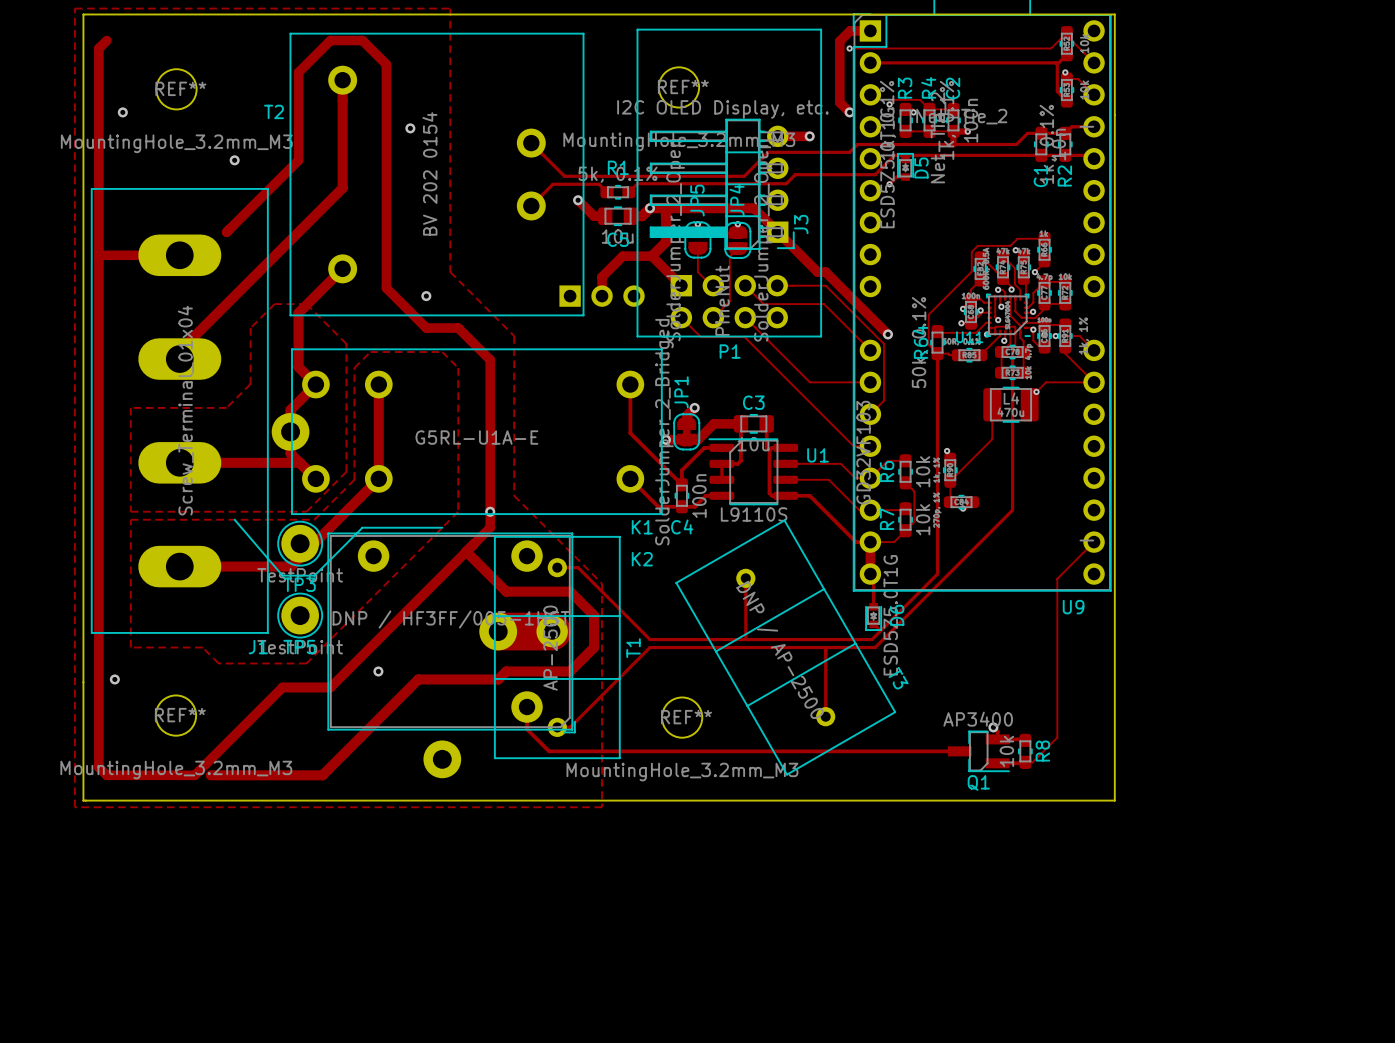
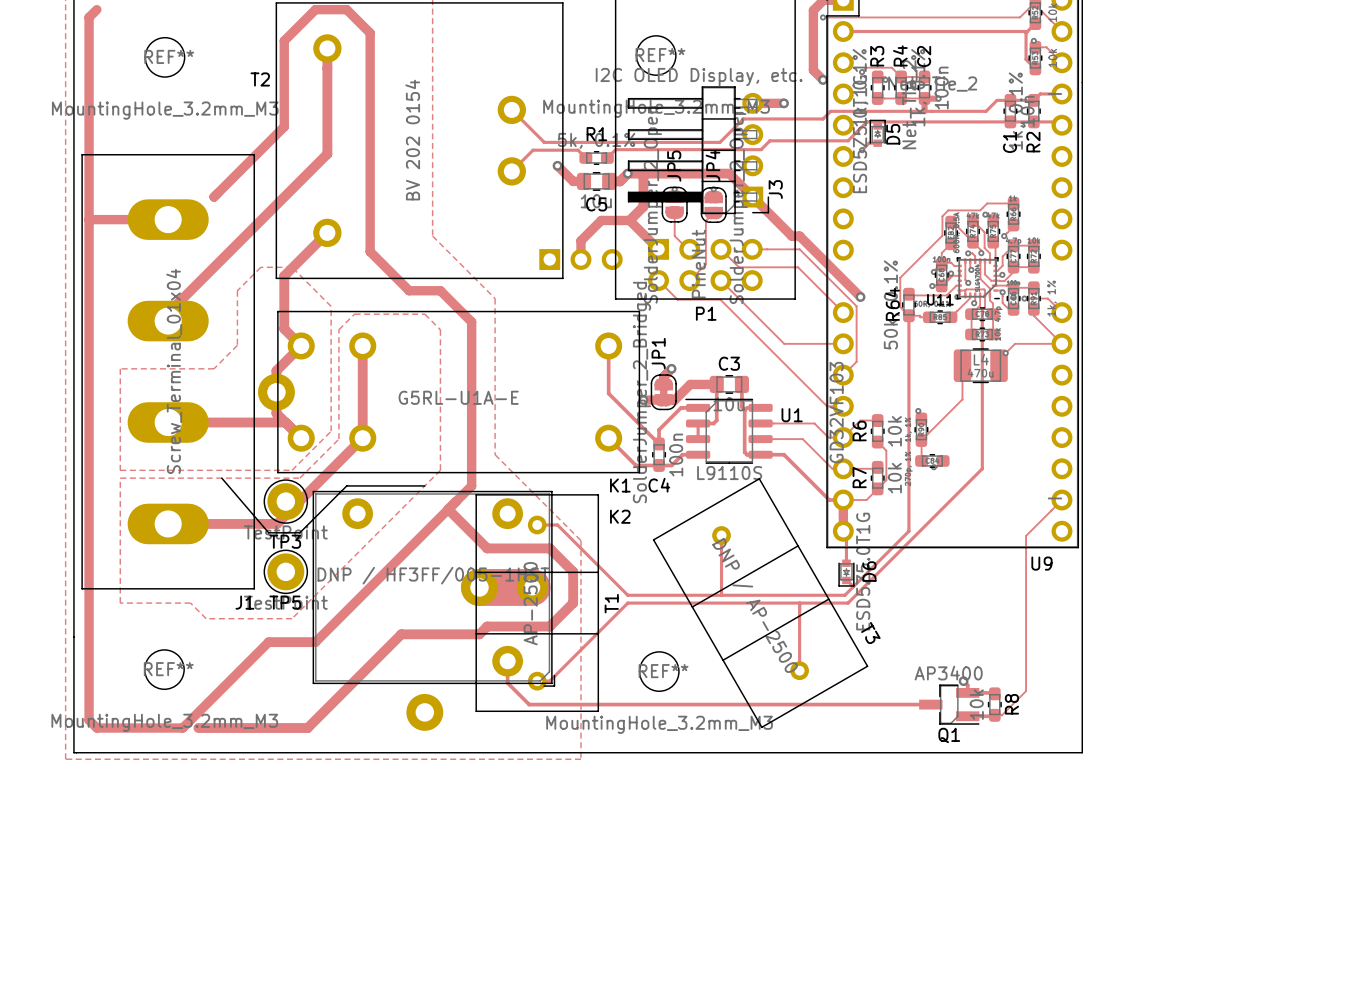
via: (122, 112) -> none
via: (410, 128) -> none
via: (234, 160) -> none
via: (426, 296) -> none
via: (490, 511) -> none
via: (378, 671) -> none
via: (114, 679) -> none

